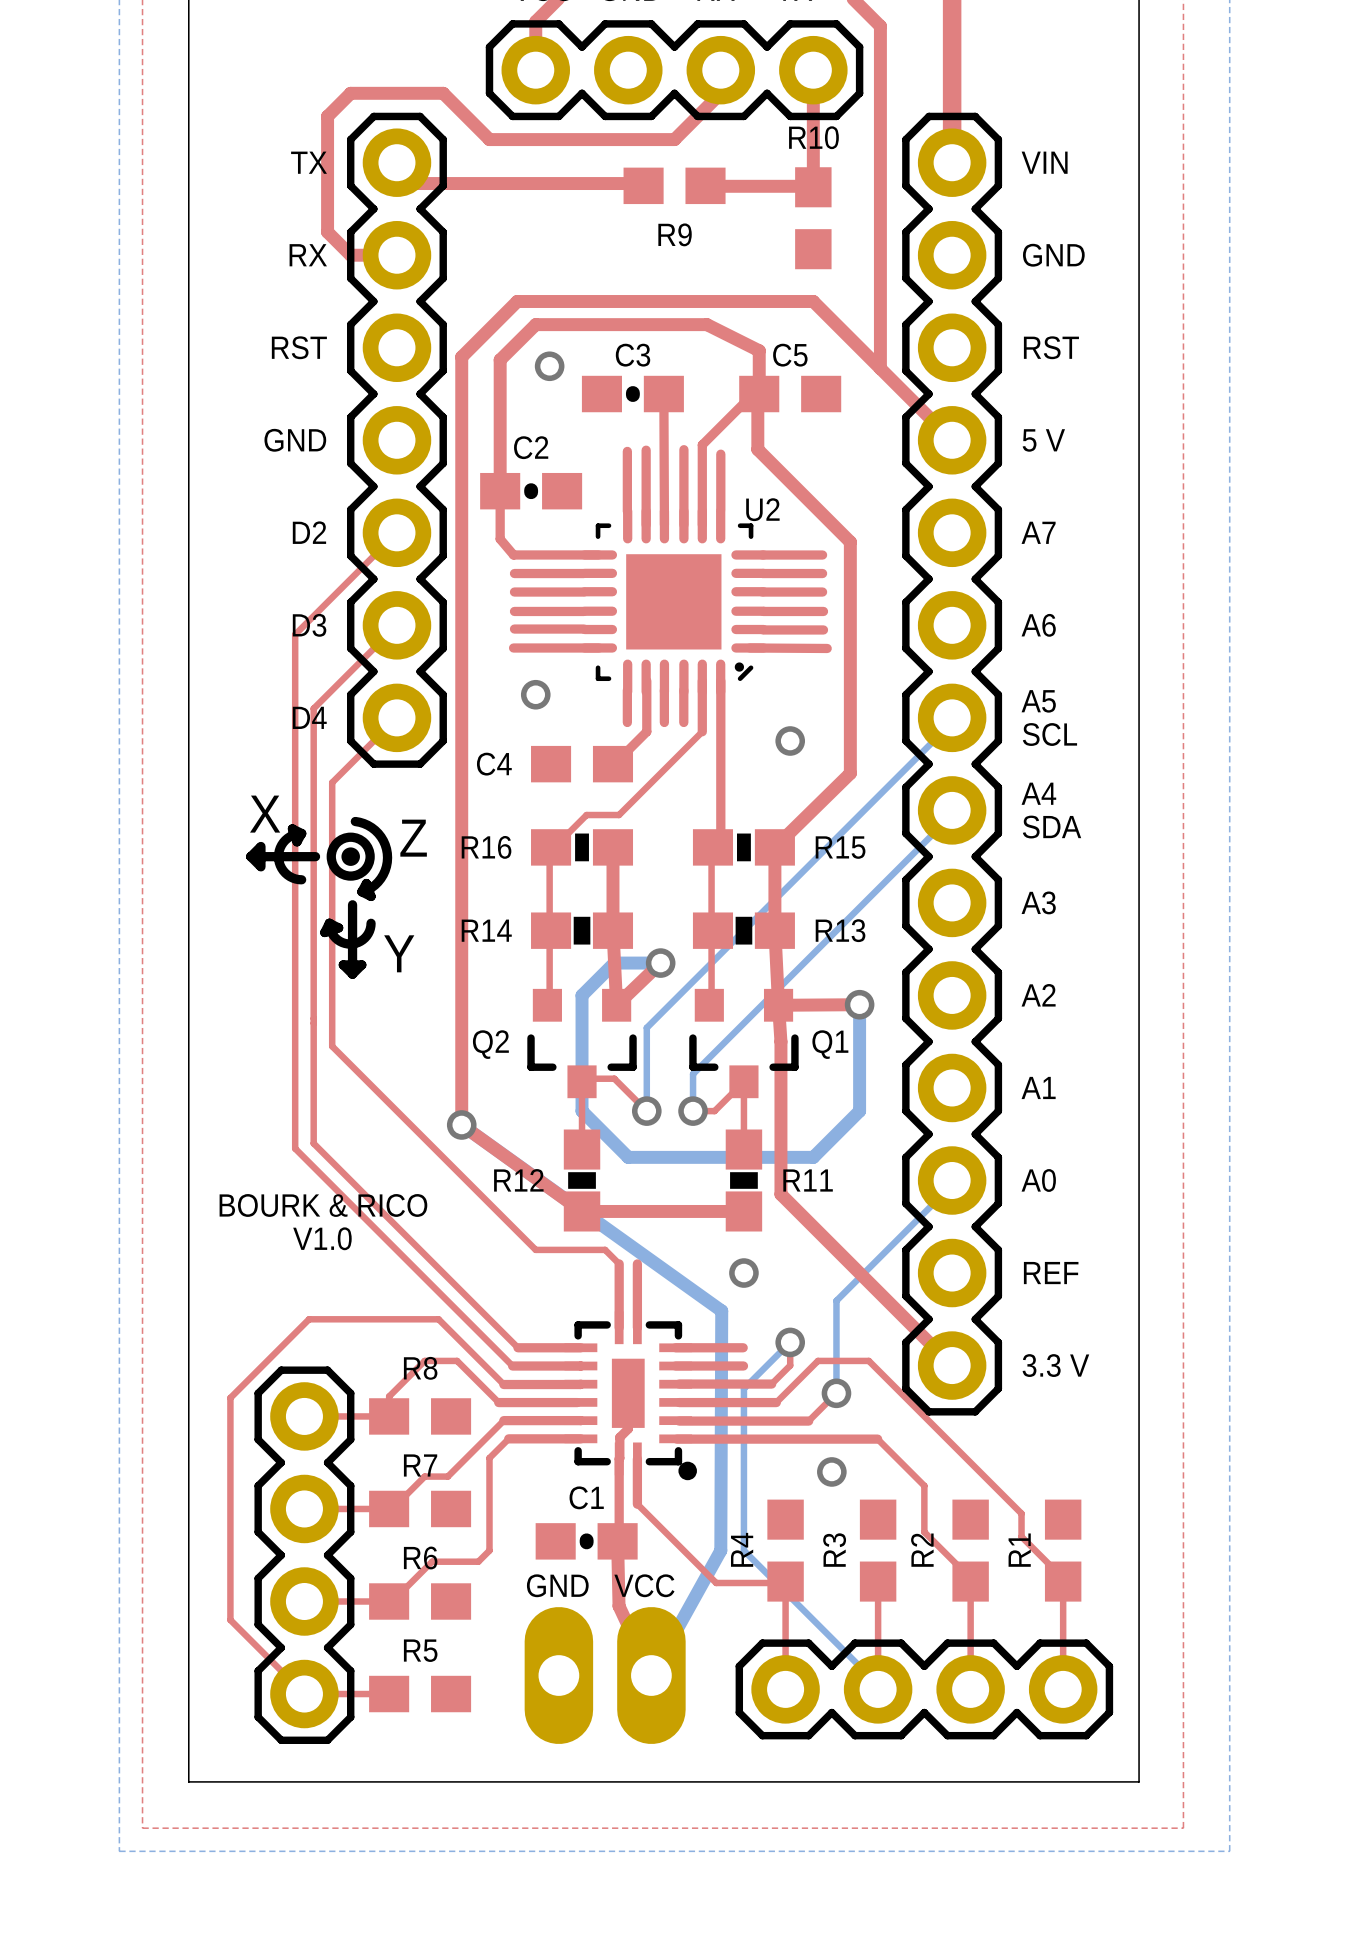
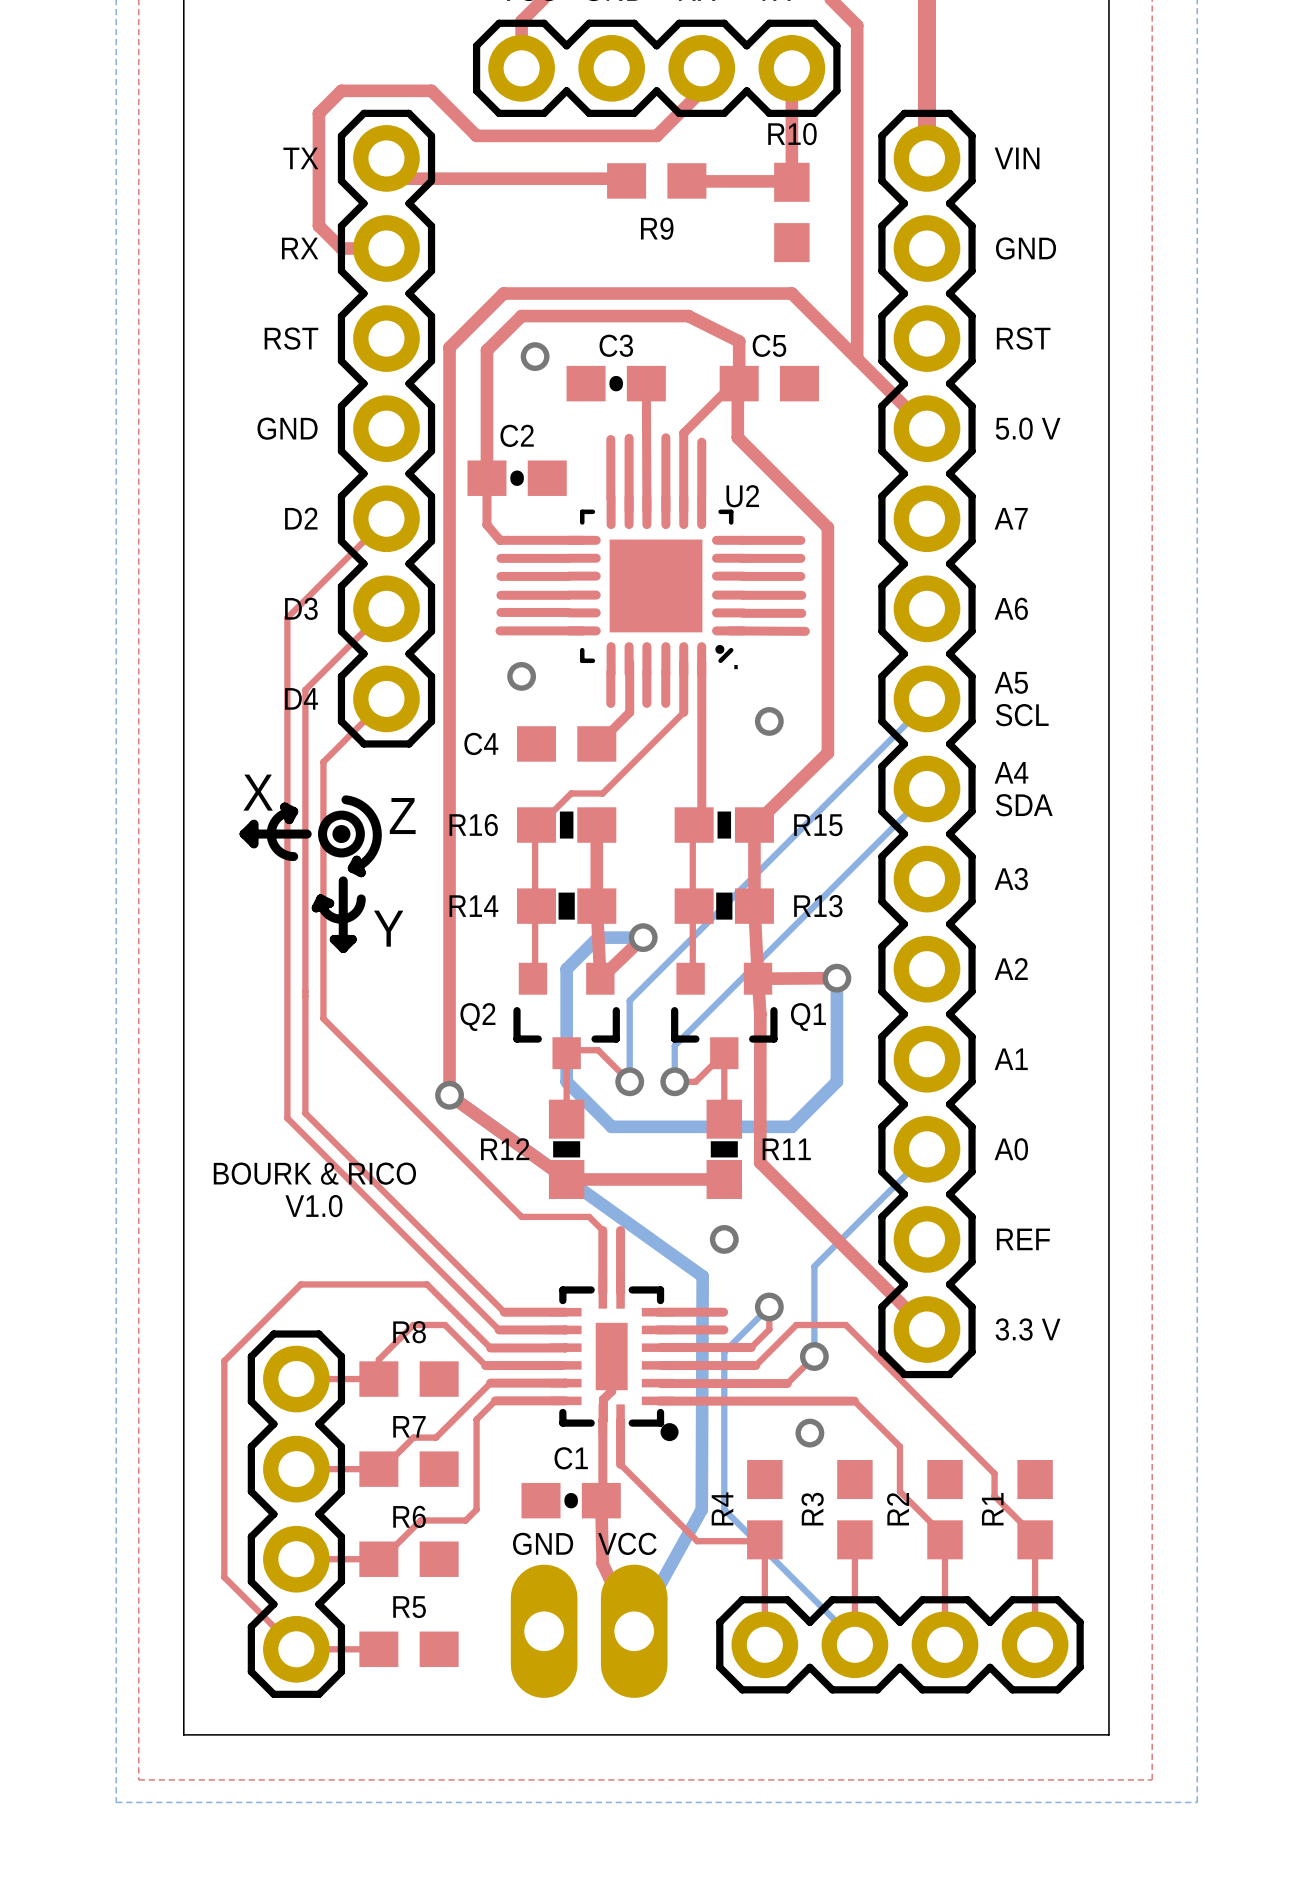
text: 5 V (1043, 440) -> 5.0 V (1028, 428)
text: none -> . (736, 667)

